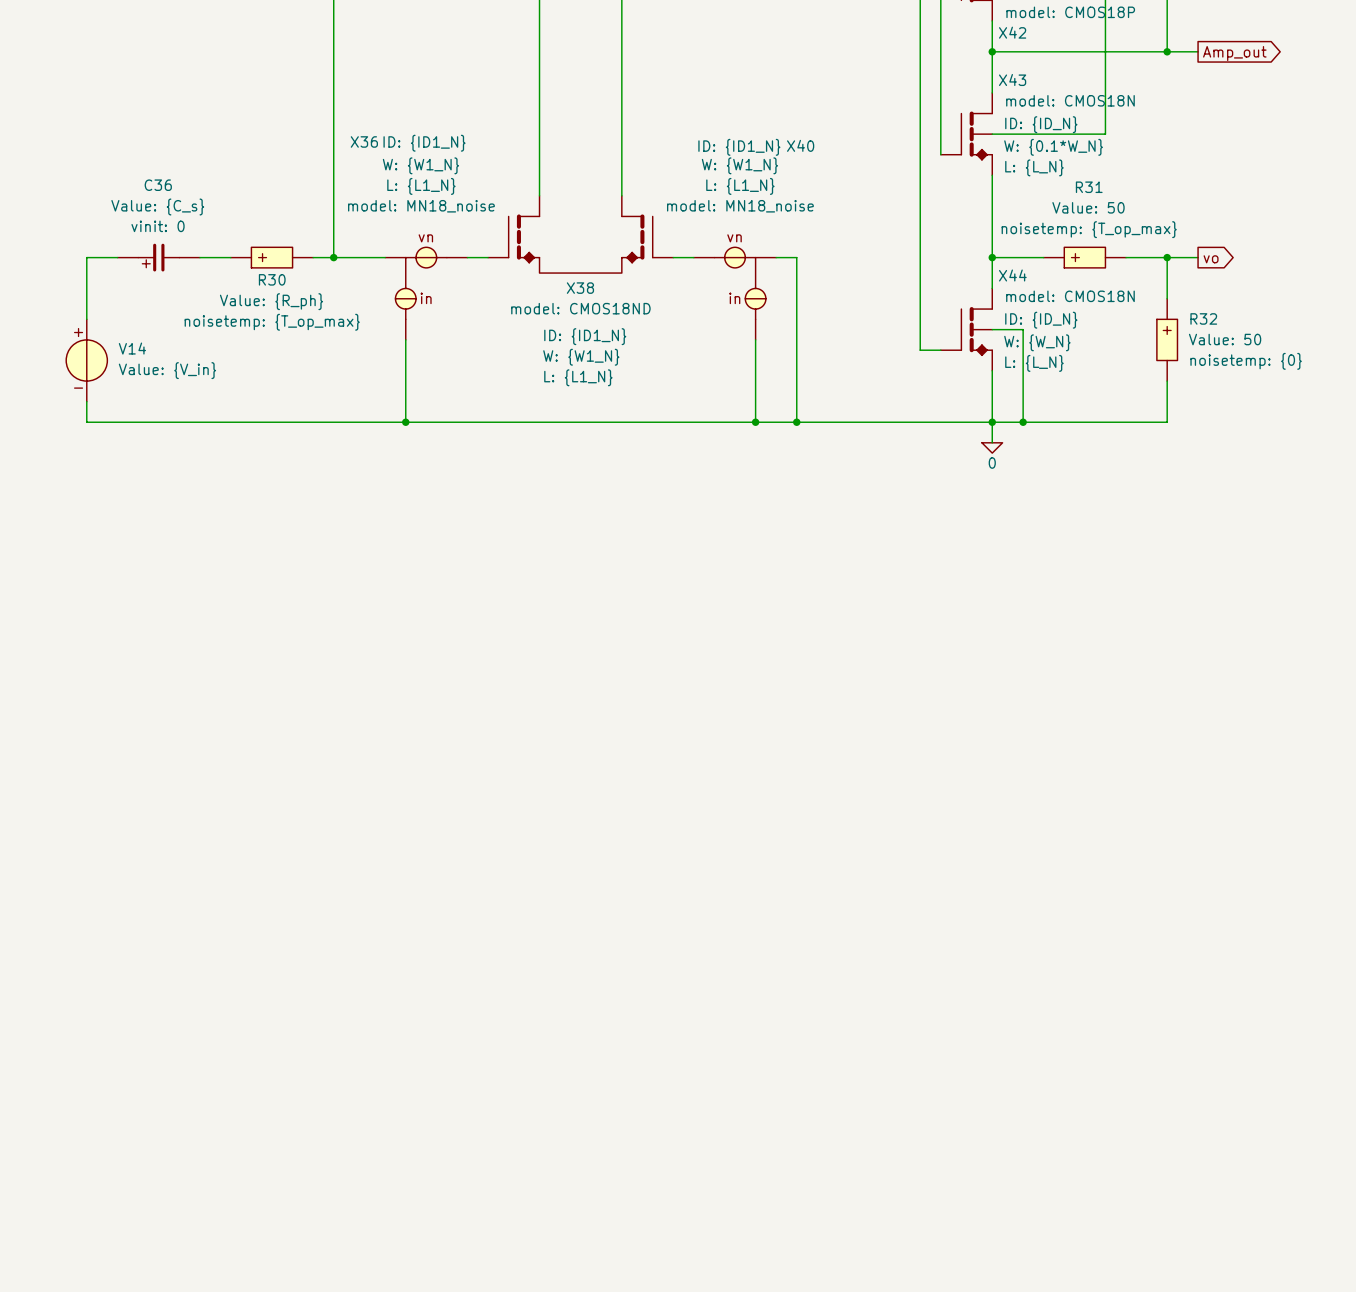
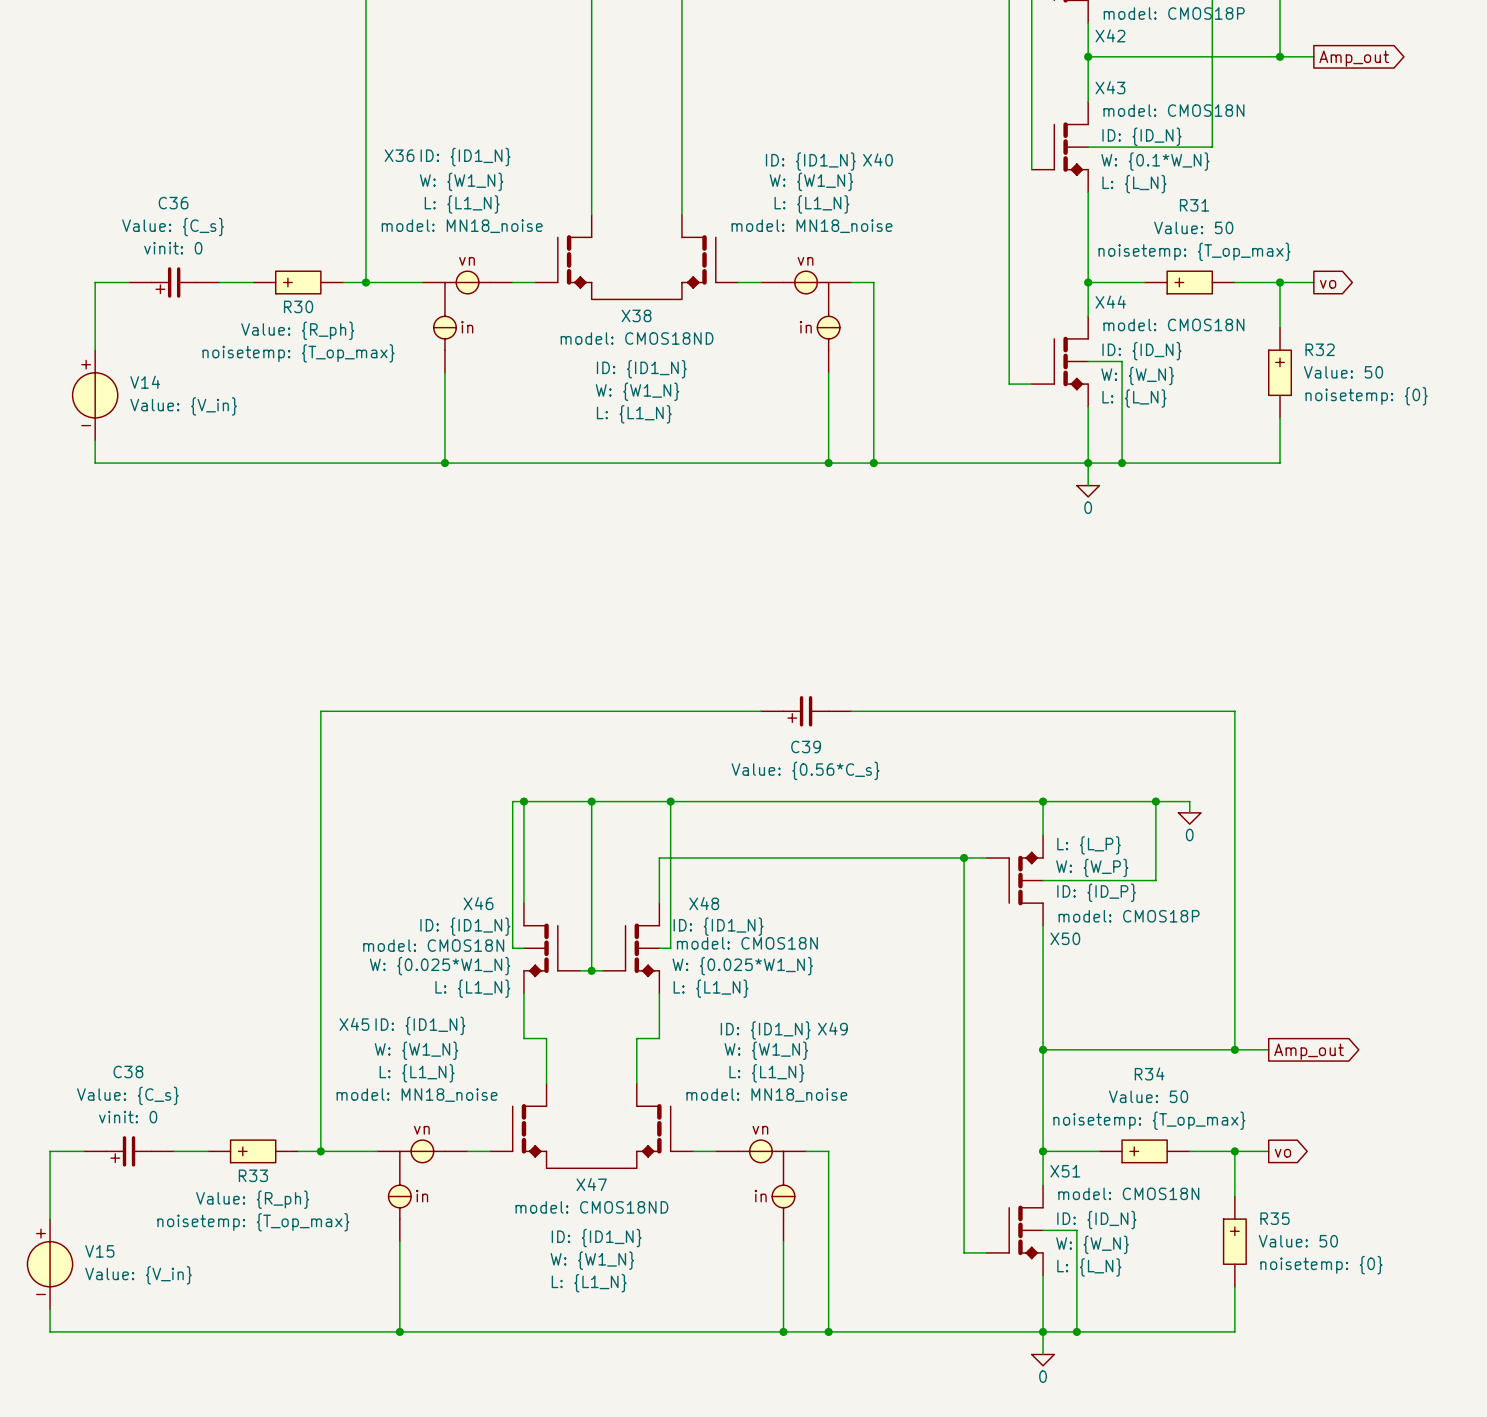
wire: none -> (760, 711) (320, 711) (320, 1151)
C39: none -> Value: {0.56*C_s} (806, 711)
wire: none -> (851, 711) (1234, 711) (1234, 1049)
wire: none -> (523, 801) (523, 903)
junction: none -> (523, 801)
wire: none -> (591, 801) (591, 970)
junction: none -> (591, 801)
wire: none -> (670, 801) (670, 948) (659, 948)
junction: none -> (670, 801)
wire: none -> (1043, 801) (1043, 835)
junction: none -> (1043, 801)
wire: none -> (1155, 801) (1155, 880) (1043, 880)
junction: none -> (1155, 801)
wire: none -> (1189, 812) (1189, 801) (512, 801) (512, 948) (523, 948)
power symbol: none -> 0 (1189, 818)
wire: none -> (964, 857) (964, 1252) (986, 1252)
junction: none -> (964, 857)
wire: none -> (986, 857) (659, 857) (659, 903)
X50: none -> (1014, 880)
wire: none -> (1043, 925) (1043, 1185)
X46: none -> (552, 948)
X48: none -> (631, 948)
wire: none -> (580, 970) (602, 970)
junction: none -> (591, 970)
wire: none -> (523, 993) (523, 1038) (546, 1038) (546, 1083)
wire: none -> (659, 993) (659, 1038) (636, 1038) (636, 1083)
wire: none -> (1043, 1049) (1268, 1049)
junction: none -> (1043, 1049)
junction: none -> (1234, 1049)
global label: none -> Amp_out (1309, 1051)
X47: none -> (591, 1125)
wire: none -> (83, 1151) (50, 1151) (50, 1219)
C38: none -> Value: {C_s} (129, 1151)
wire: none -> (174, 1151) (208, 1151)
R33: none -> Value: {R_ph} (253, 1151)
wire: none -> (298, 1151) (377, 1151)
junction: none -> (320, 1151)
wire: none -> (467, 1151) (490, 1151)
wire: none -> (693, 1151) (715, 1151)
wire: none -> (806, 1151) (828, 1151) (828, 1331)
wire: none -> (1043, 1151) (1099, 1151)
junction: none -> (1043, 1151)
R34: none -> Value: 50 (1144, 1151)
wire: none -> (1189, 1151) (1268, 1151)
wire: none -> (1234, 1151) (1234, 1196)
junction: none -> (1234, 1151)
global label: none -> vo (1282, 1153)
X45: none -> (422, 1190)
X49: none -> (760, 1190)
X51: none -> (1014, 1230)
wire: none -> (1043, 1230) (1076, 1230) (1076, 1331)
wire: none -> (399, 1241) (399, 1331)
wire: none -> (783, 1241) (783, 1331)
R35: none -> Value: 50 (1234, 1241)
V15: none -> Value: {V_in} (50, 1264)
wire: none -> (1043, 1275) (1043, 1354)
wire: none -> (1234, 1286) (1234, 1331) (50, 1331) (50, 1309)
junction: none -> (399, 1331)
junction: none -> (783, 1331)
junction: none -> (828, 1331)
junction: none -> (1043, 1331)
junction: none -> (1076, 1331)
power symbol: none -> 0 (1043, 1360)

